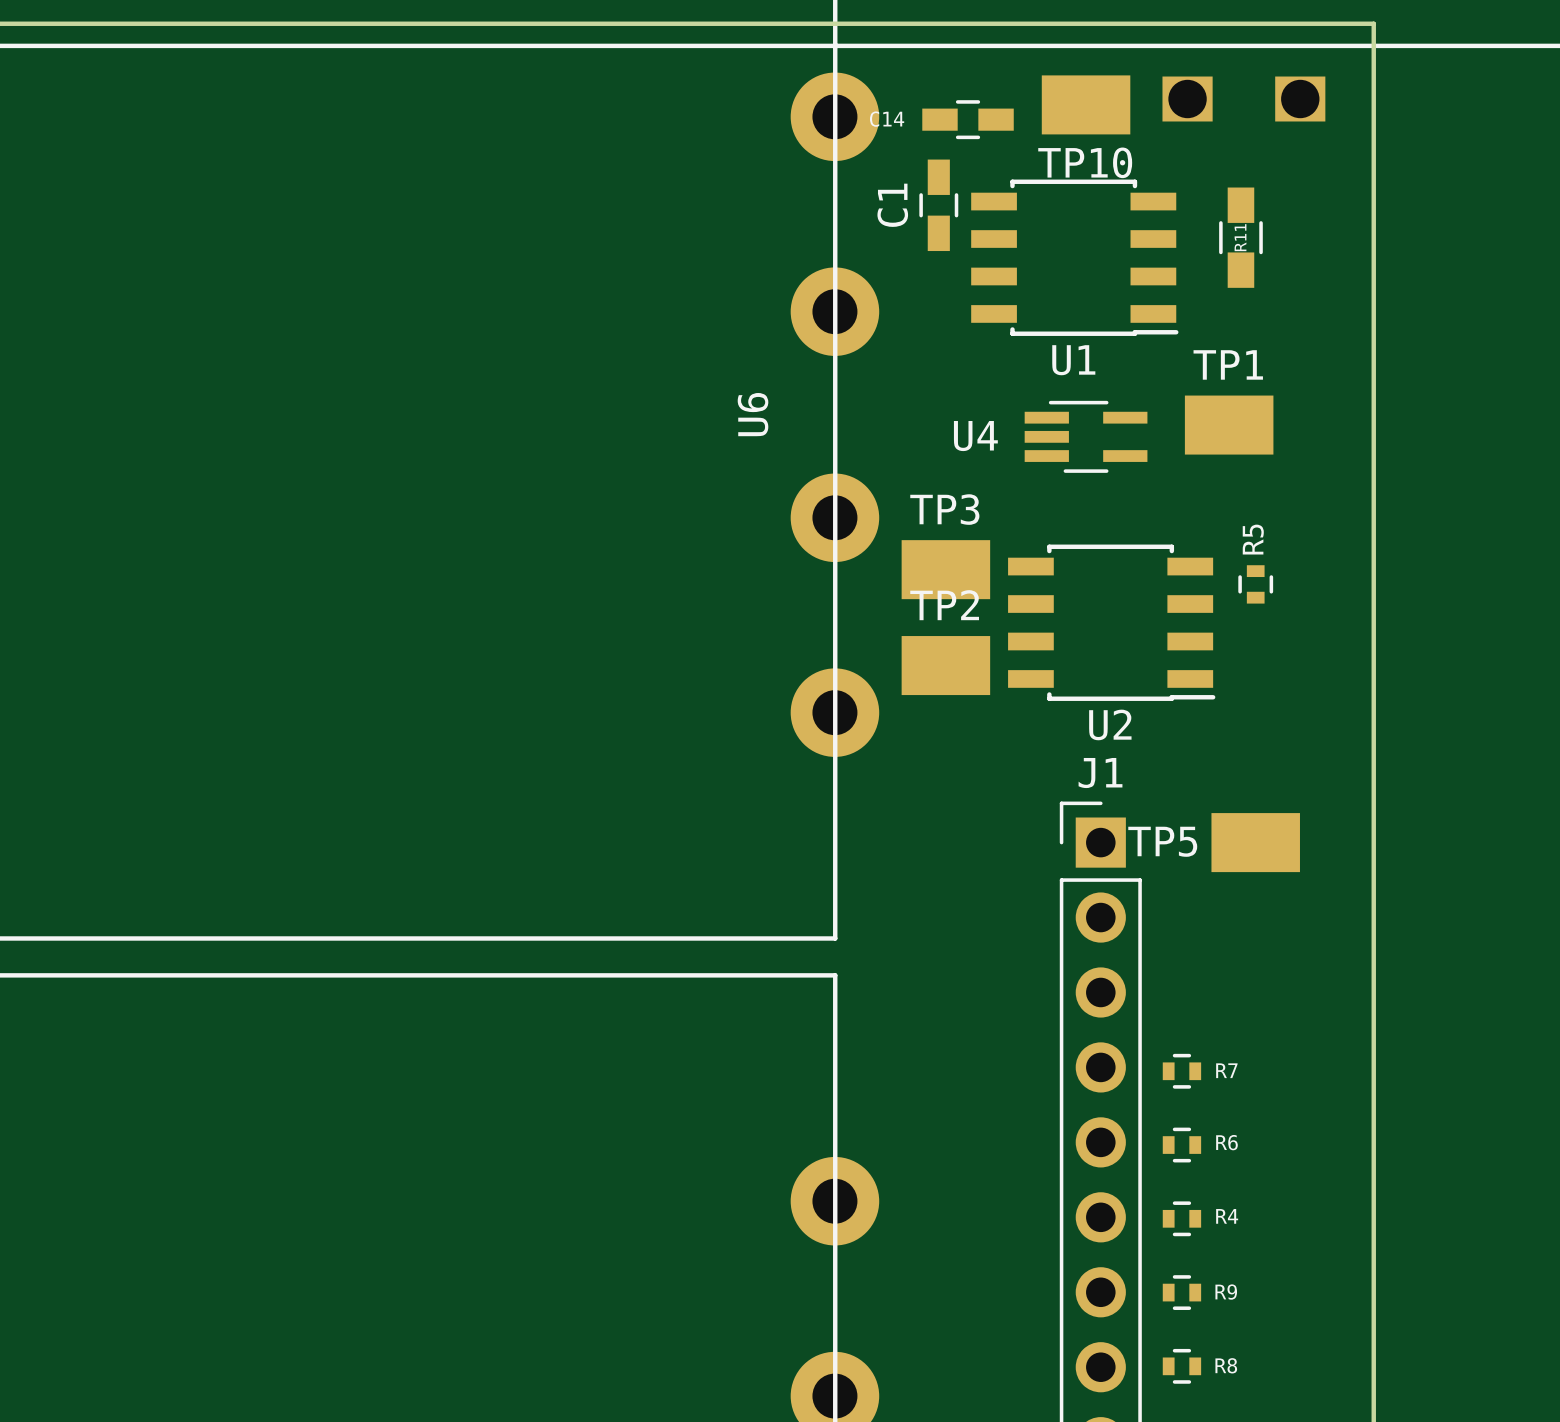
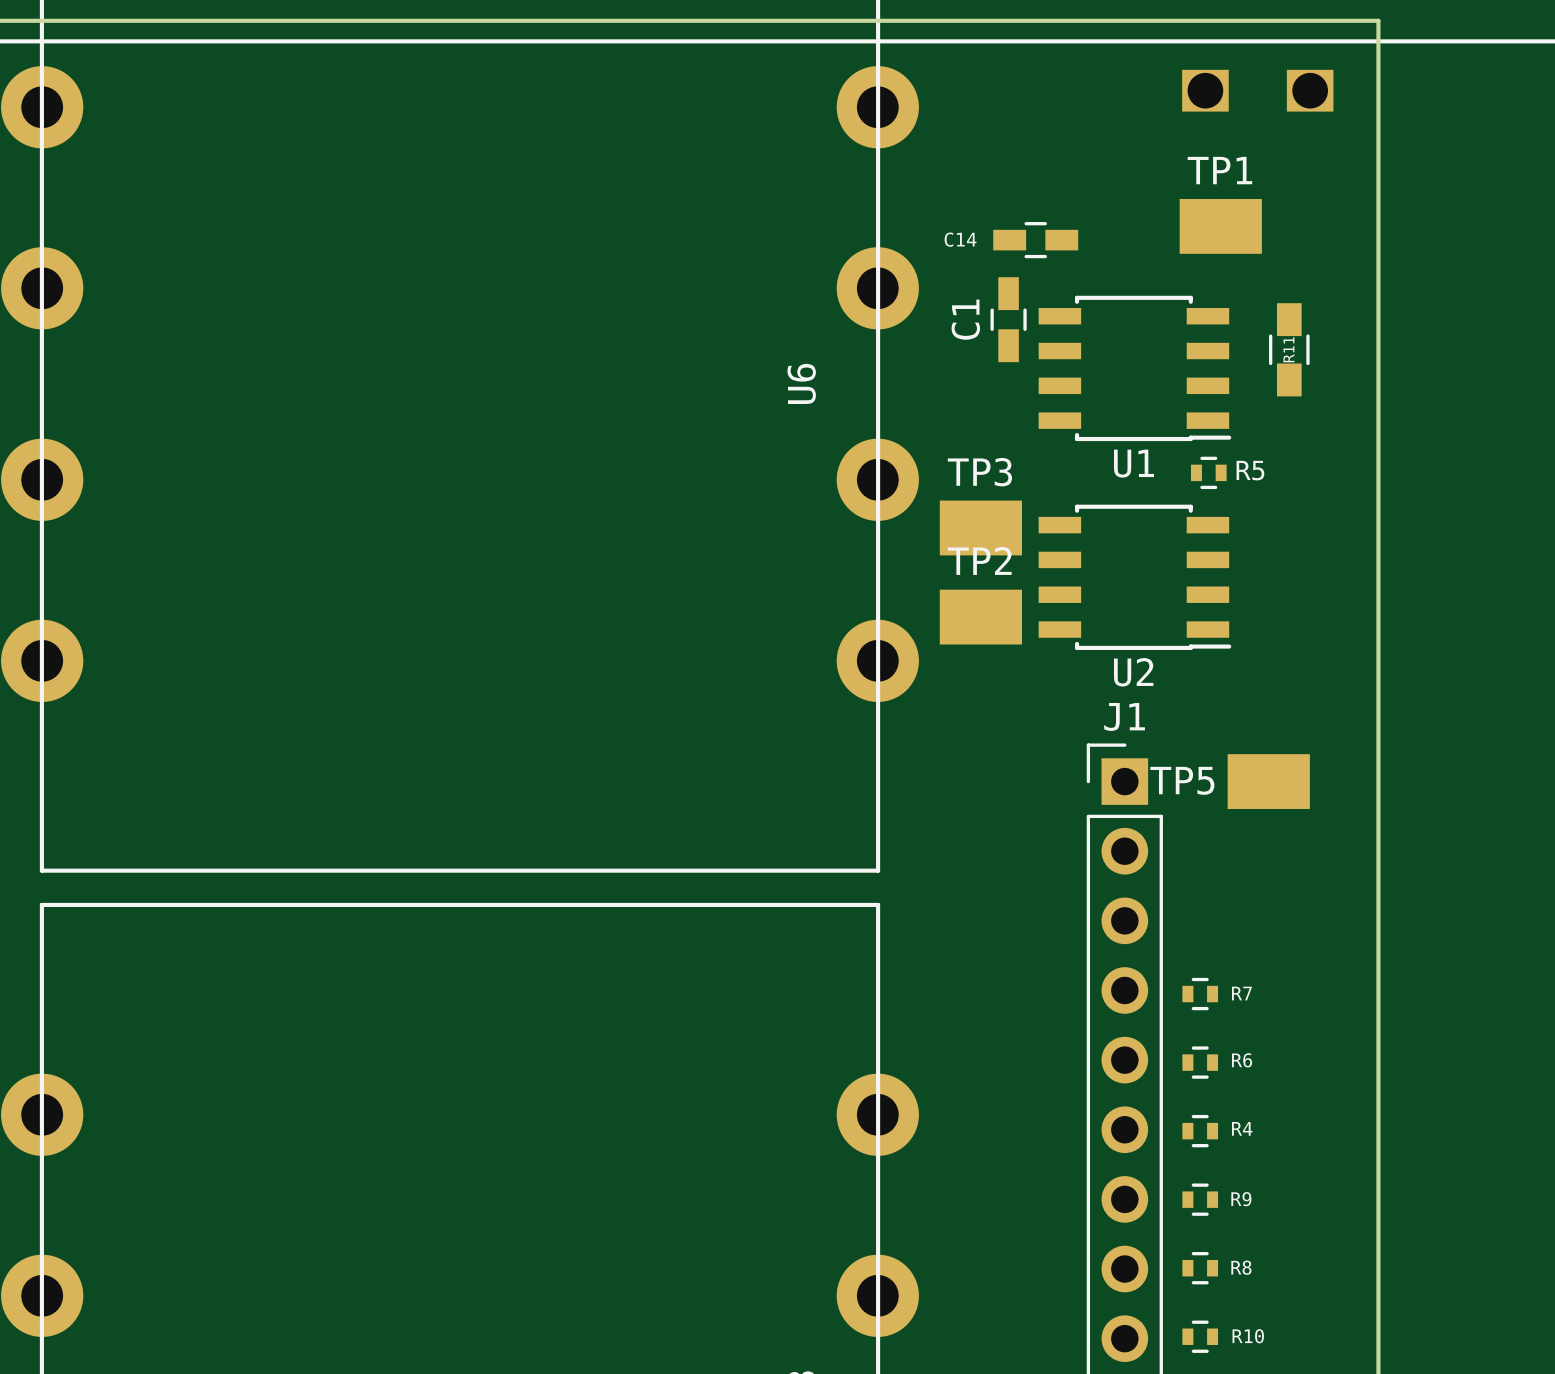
TP10: (1086, 104) -> none
C14 position: (968, 119) -> (1035, 240)
C1 position: (938, 205) -> (1008, 319)
R11 position: (1240, 237) -> (1289, 349)
U1 position: (1074, 257) -> (1134, 368)
TP1 position: (1229, 425) -> (1220, 226)
U4: (1086, 436) -> none
R5 rotation: 0° (1255, 584) -> 90° clockwise (1208, 472)
R5 position: (1255, 584) -> (1208, 472)

